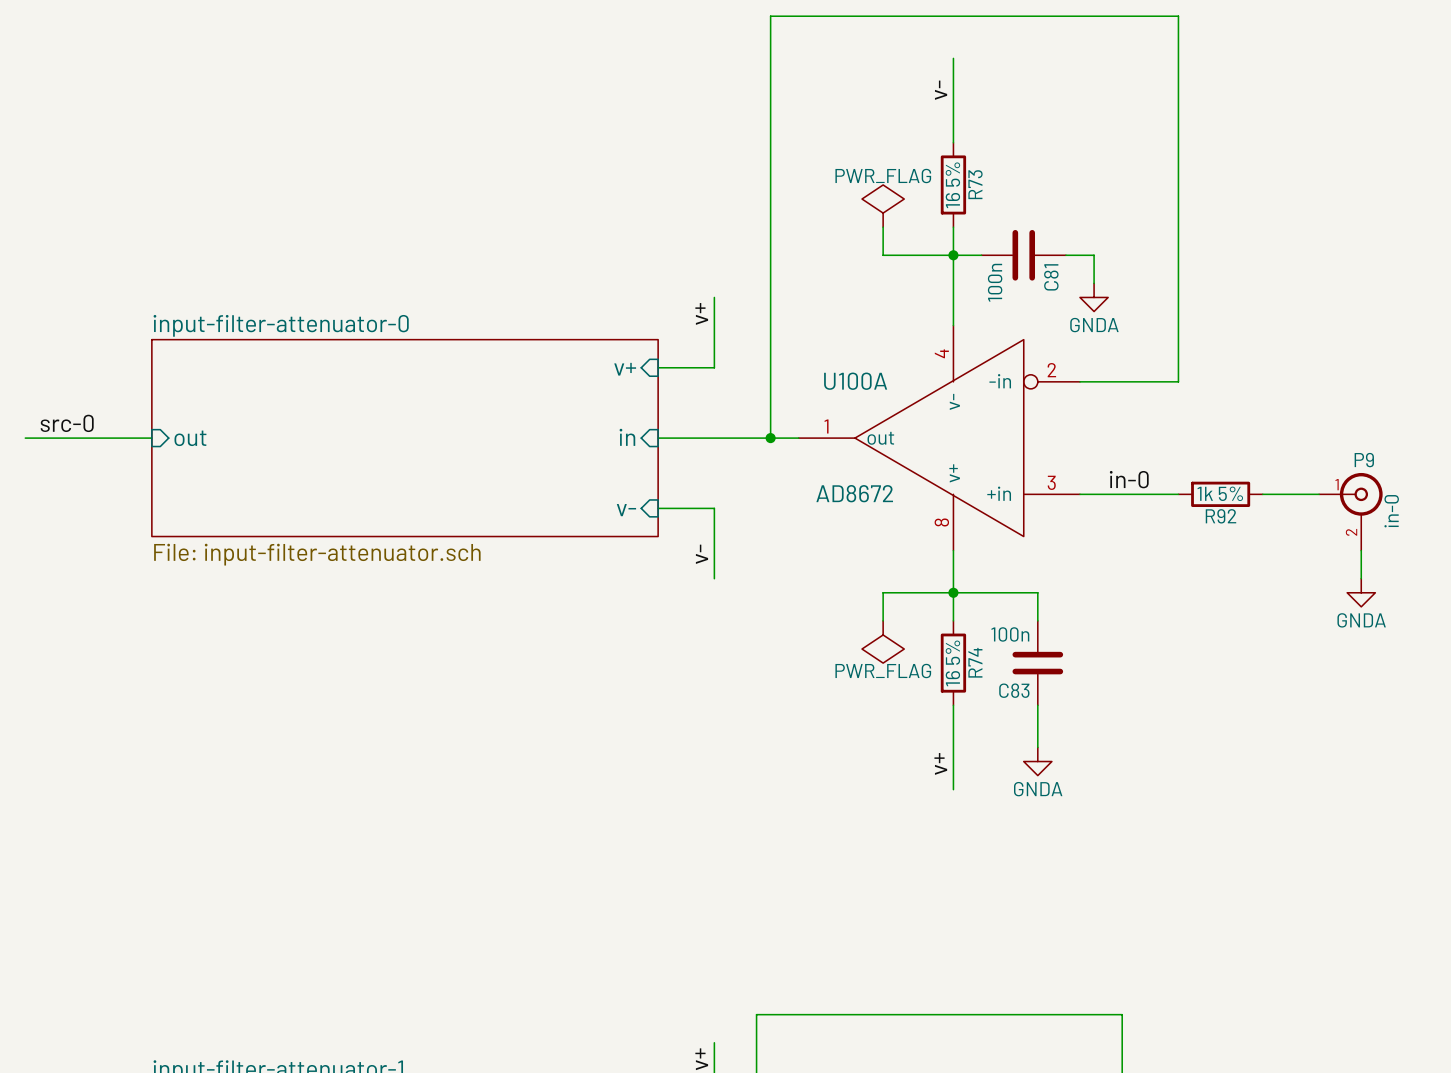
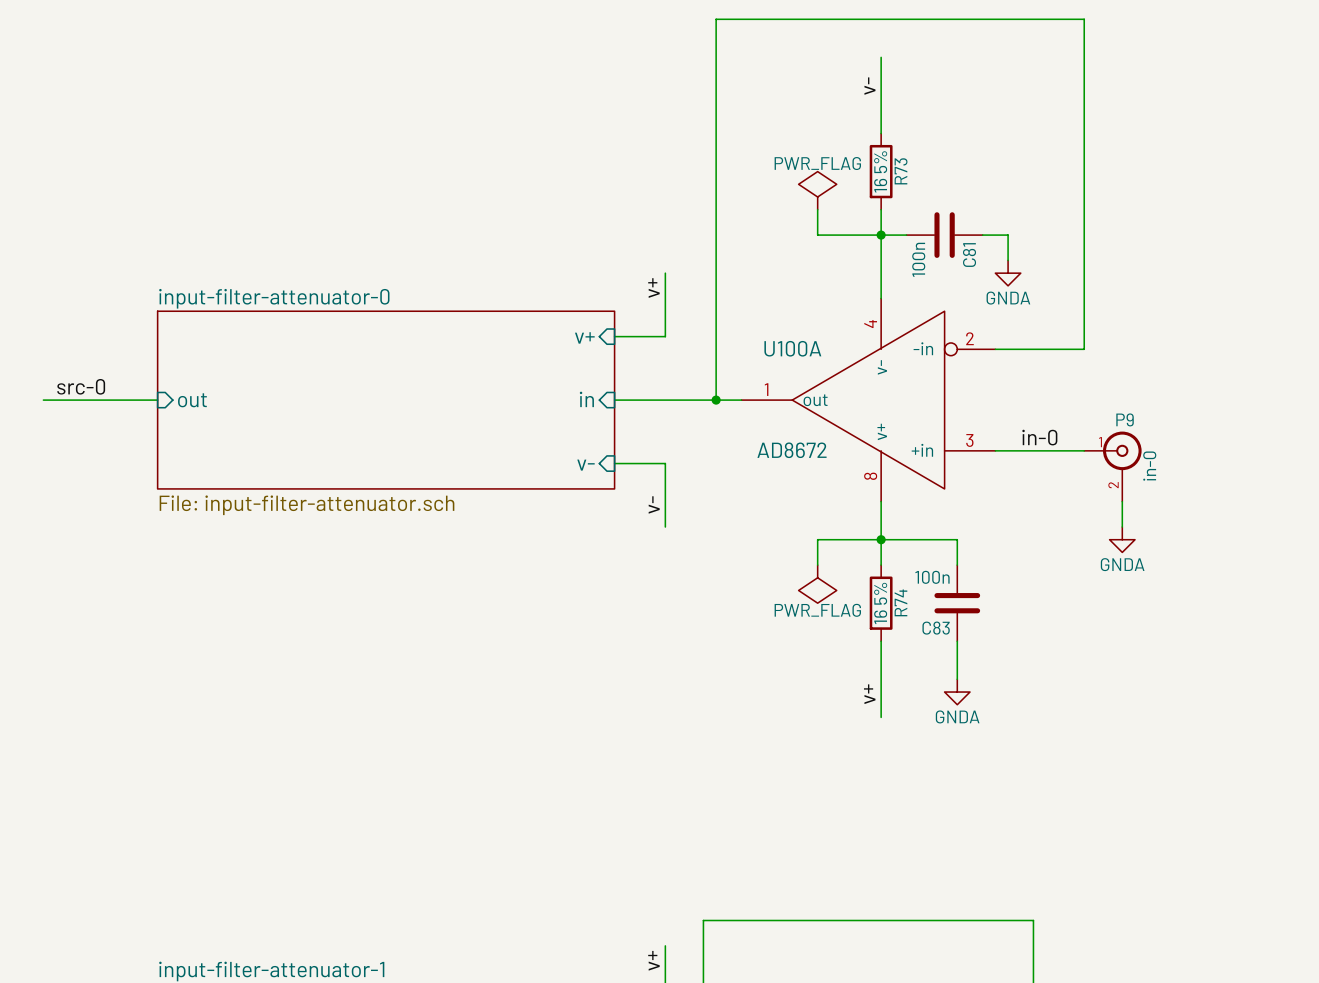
R92: 1k 5% (1220, 494) -> none
wire: (1262, 494) (1319, 494) -> none
P9 position: (1350, 511) -> (1112, 466)
wire: (1361, 550) (1361, 578) -> (1122, 501) (1122, 527)
power symbol position: GNDA (1361, 592) -> GNDA (1122, 539)

